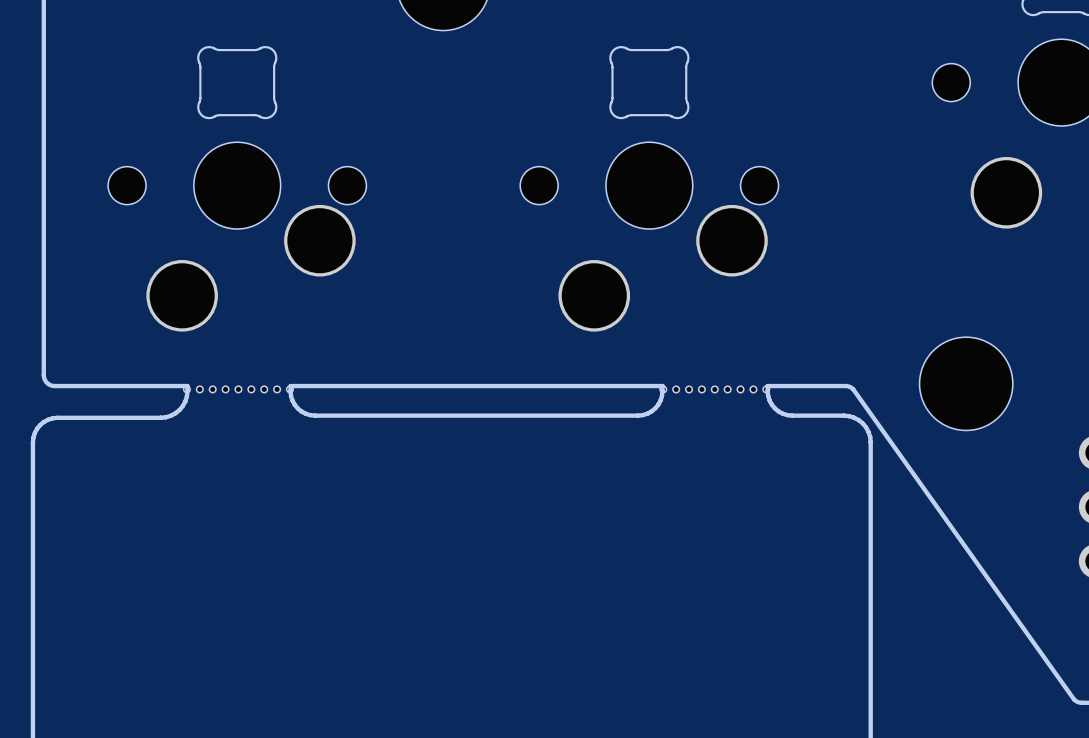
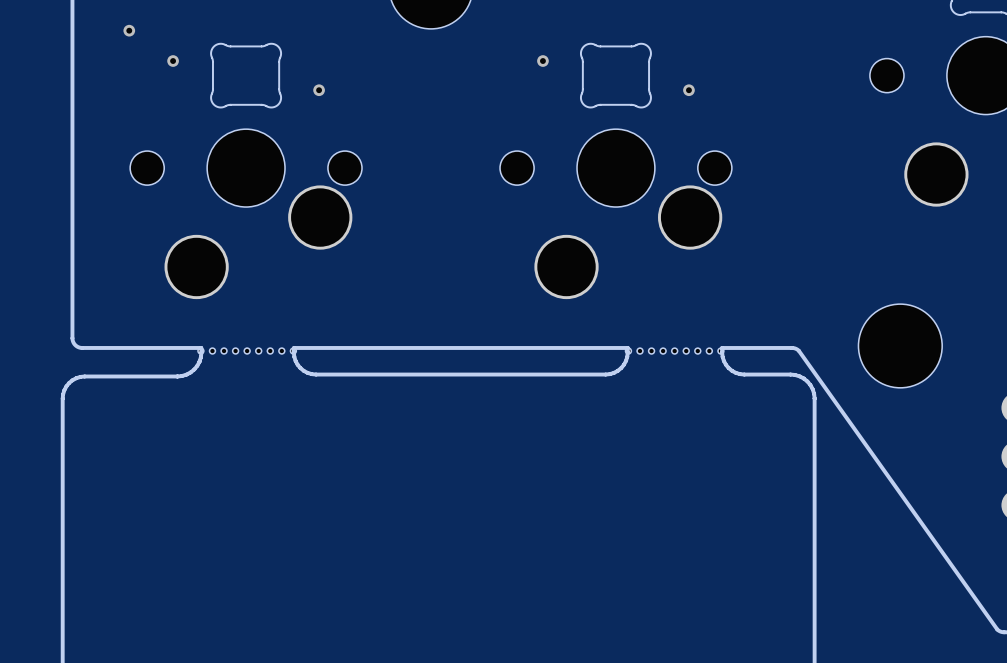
via: none -> (129, 30)
via: none -> (173, 61)
via: none -> (542, 61)
via: none -> (319, 90)
via: none -> (688, 90)

